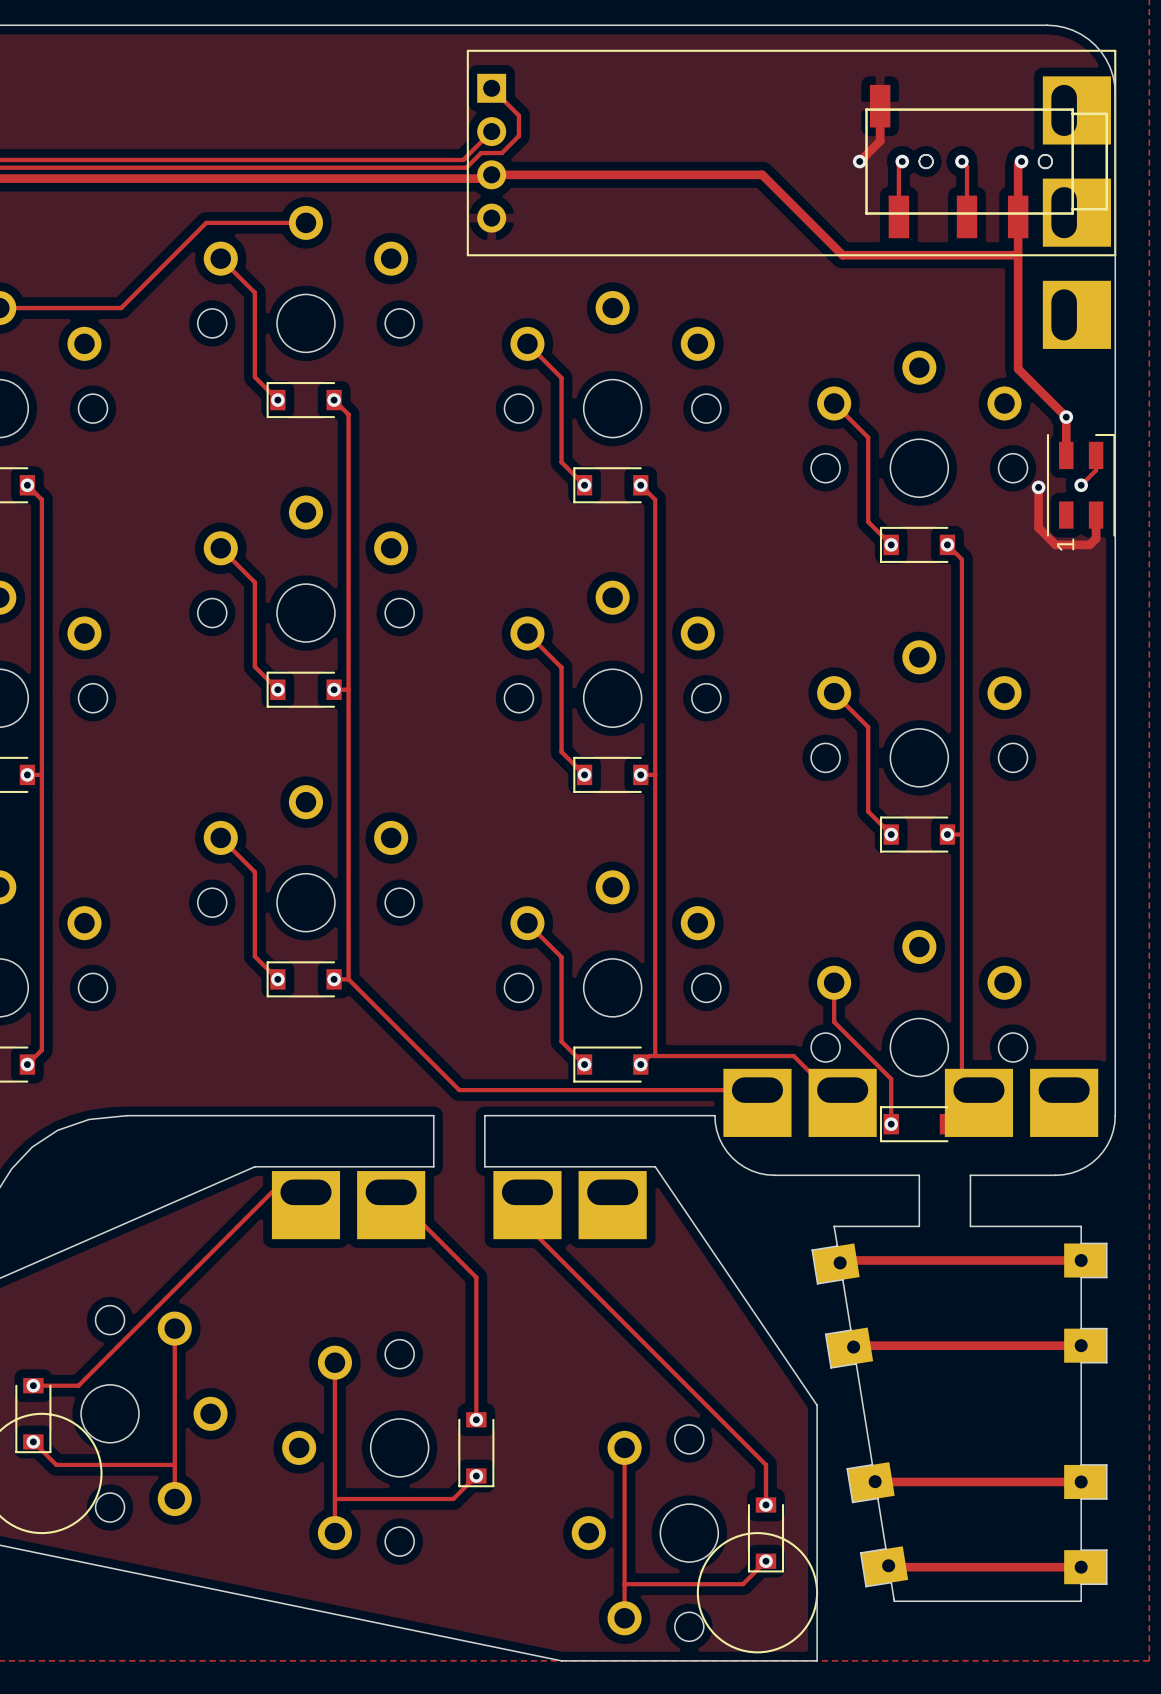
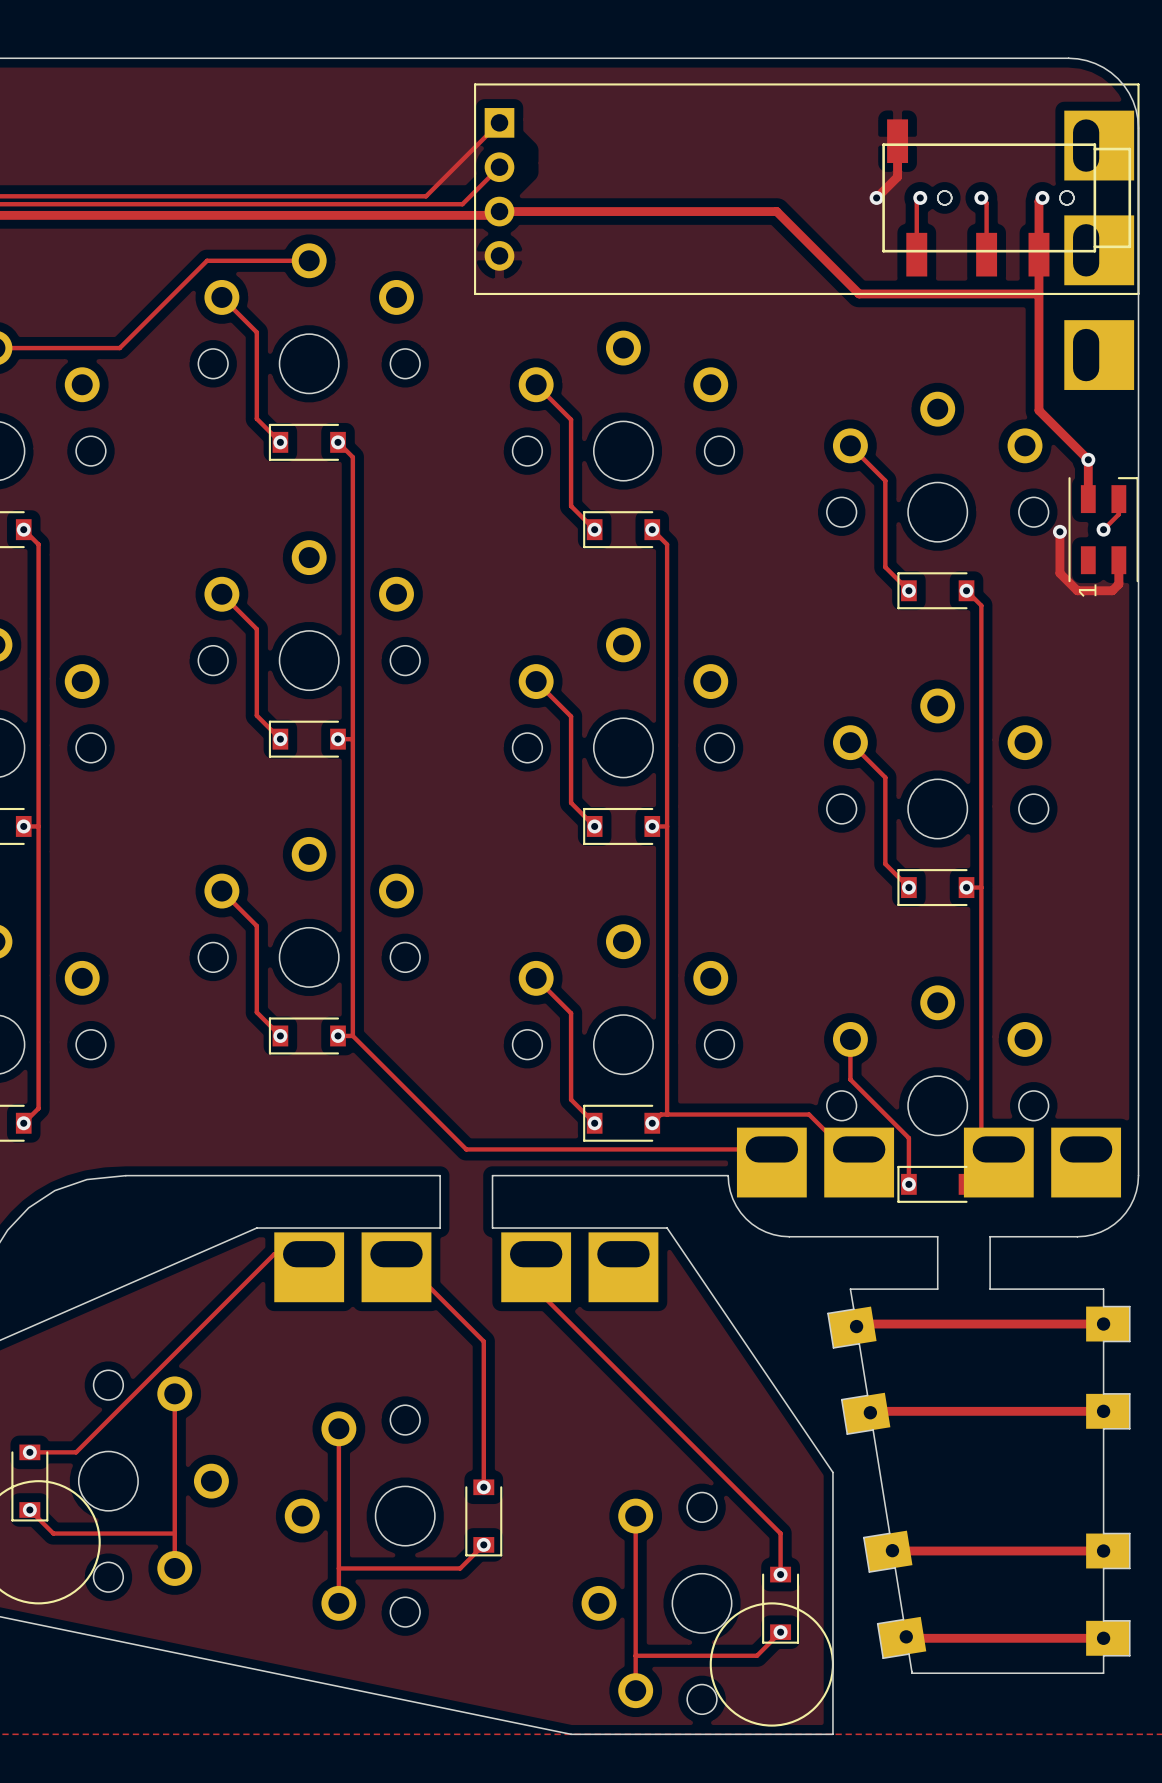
track: (491, 88) (518, 115) (518, 135) (501, 153) (481, 153) (466, 167) (455, 167) -> (499, 122) (426, 196)
track: (420, 159) (463, 159) -> (462, 204) (470, 196)

